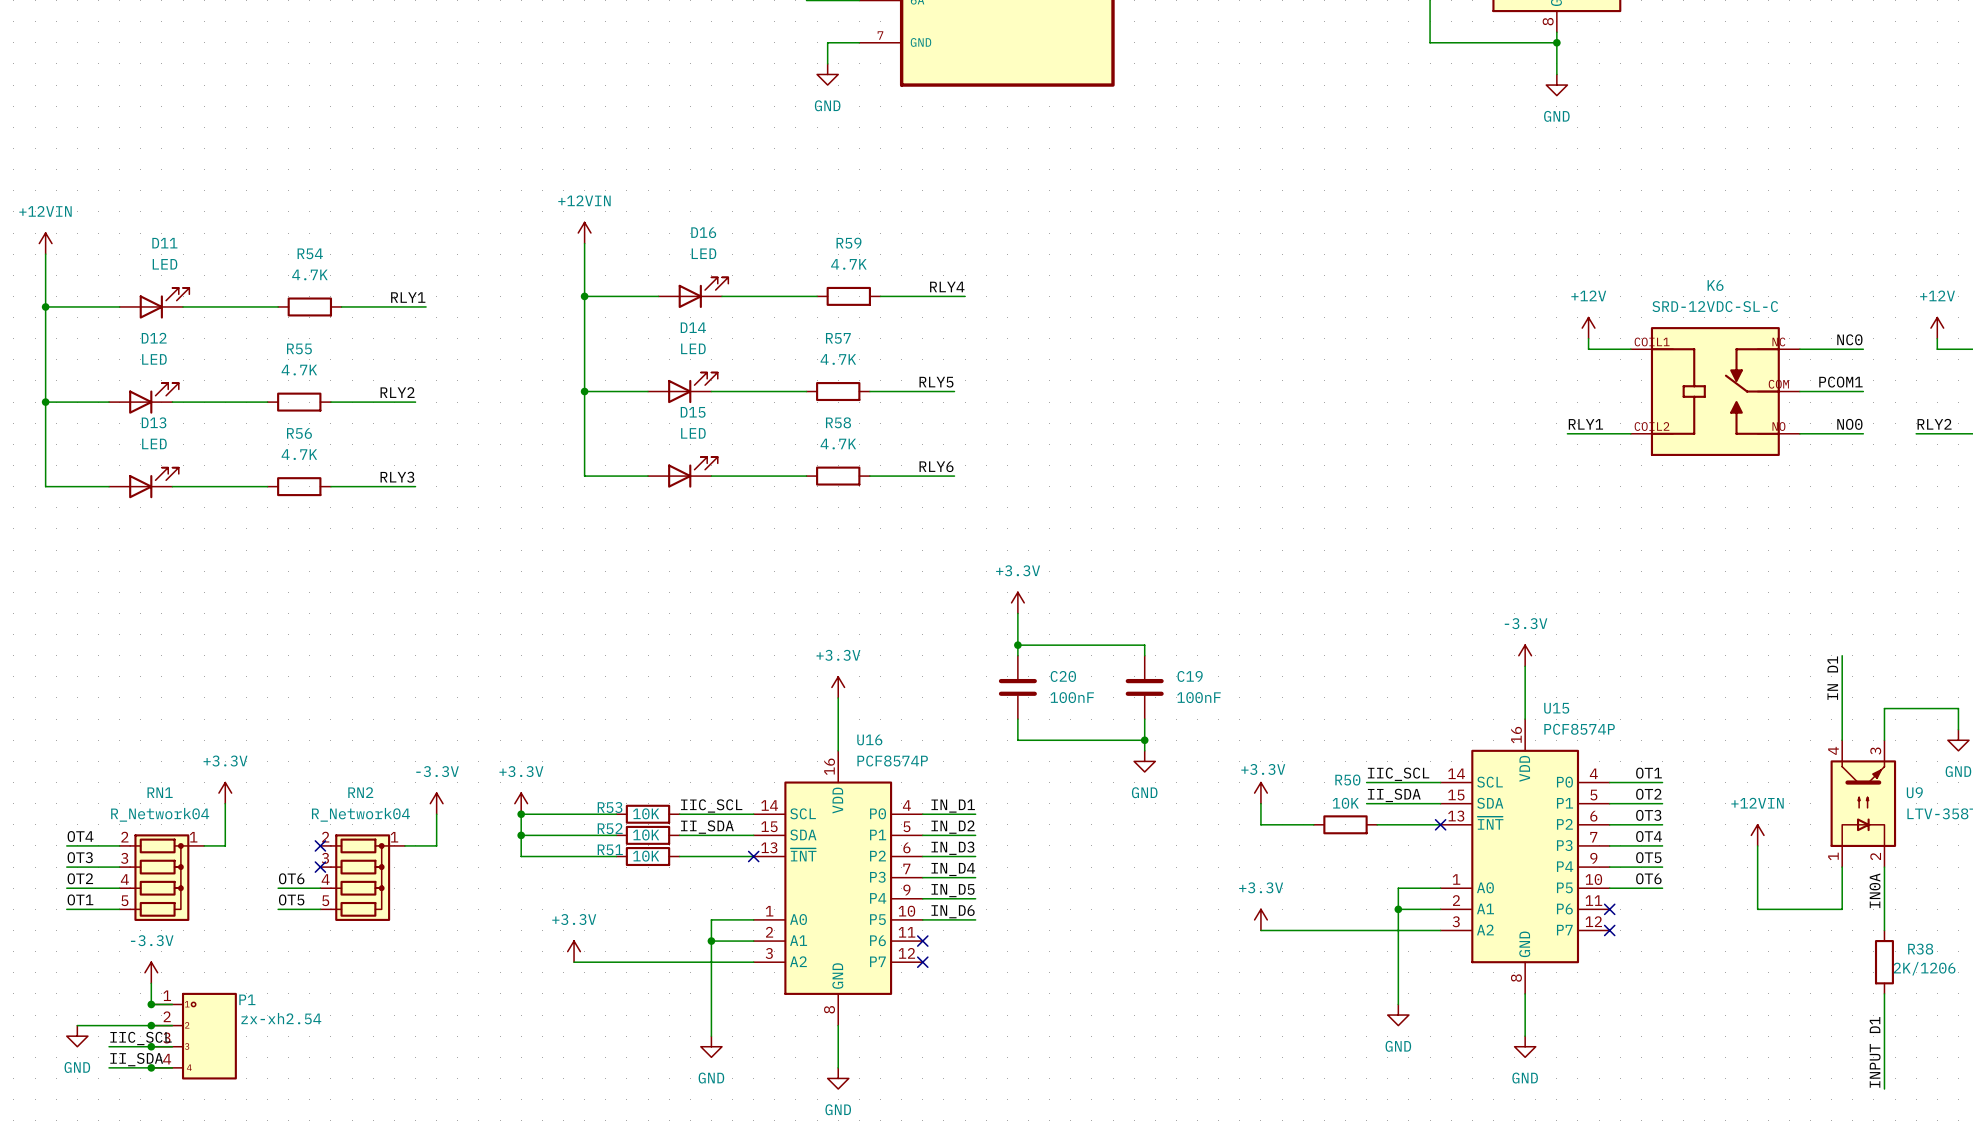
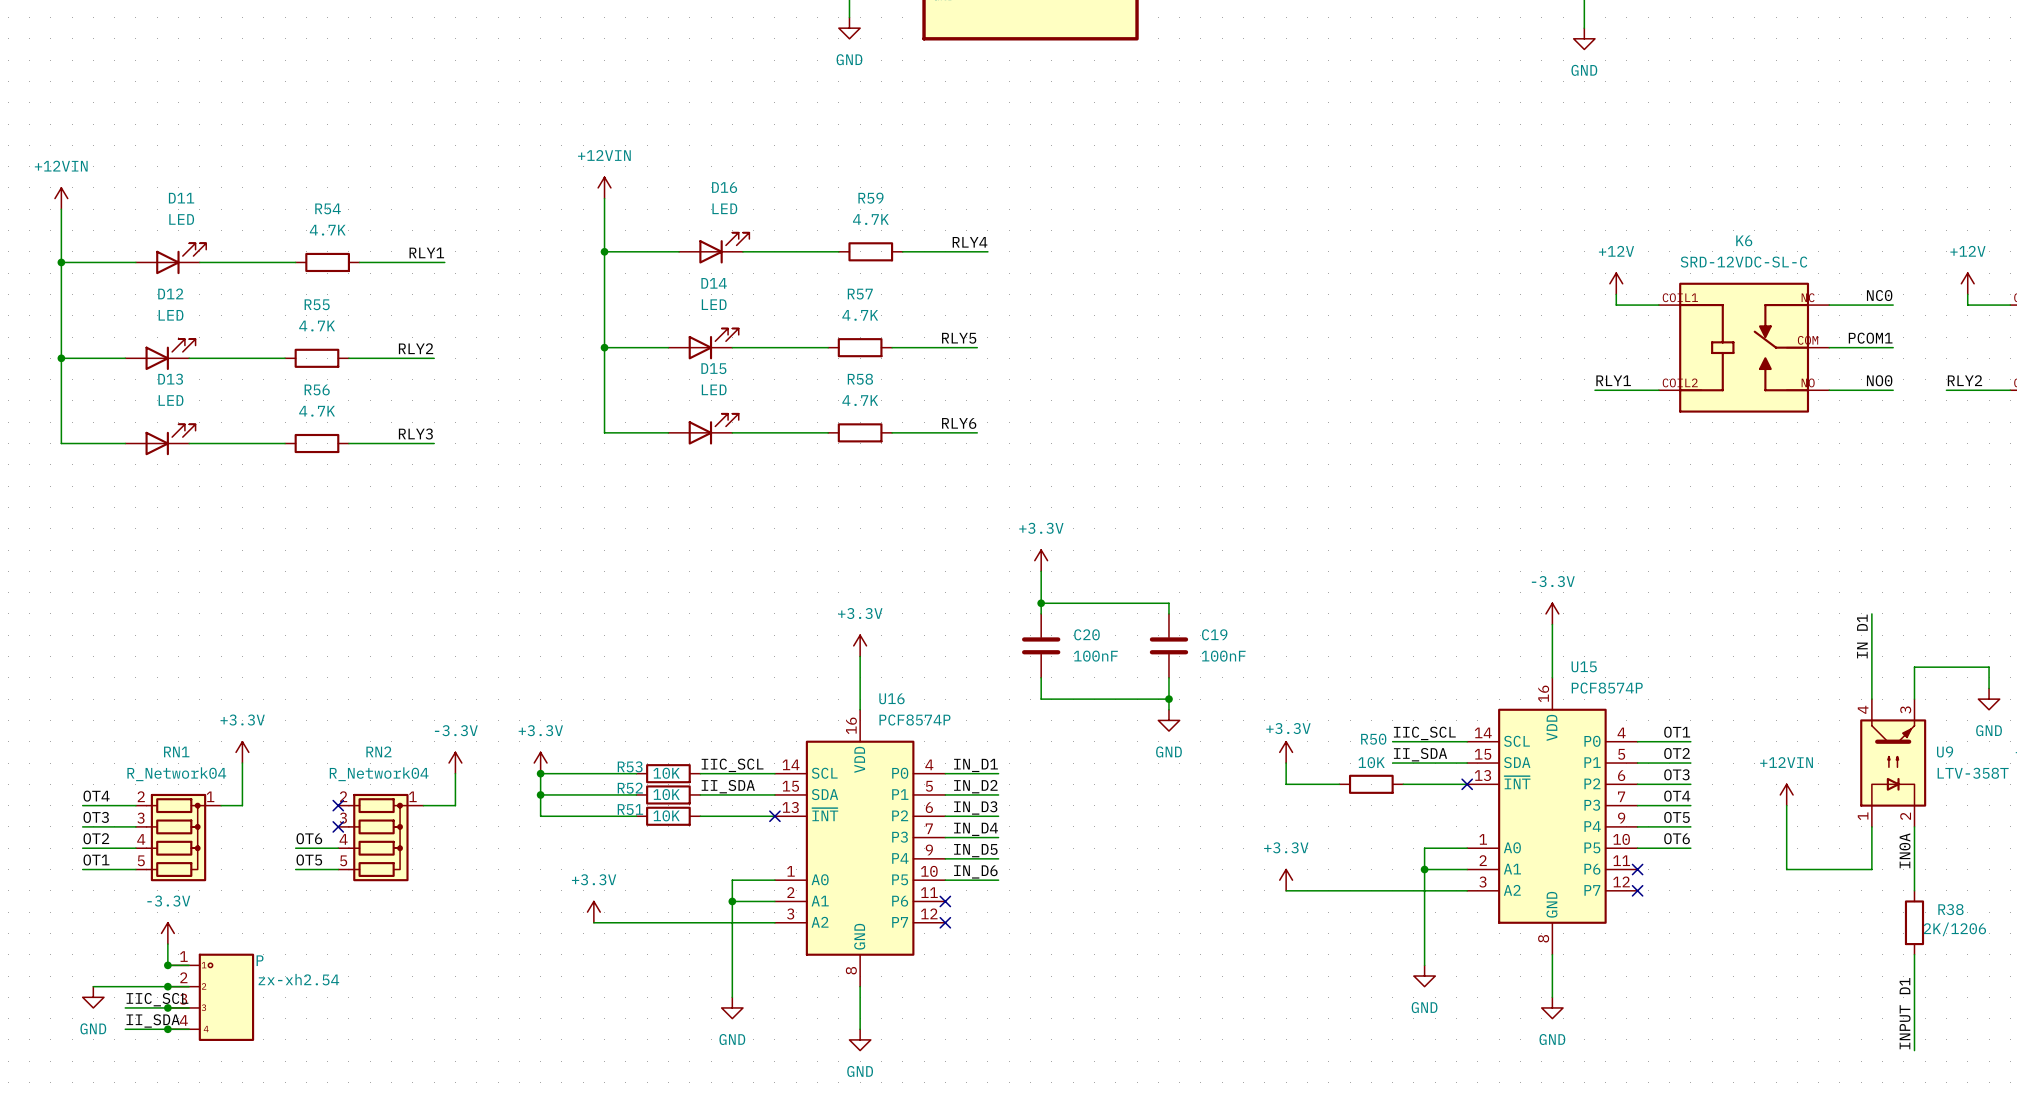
P1 name: P1 (247, 999) -> P (260, 960)

